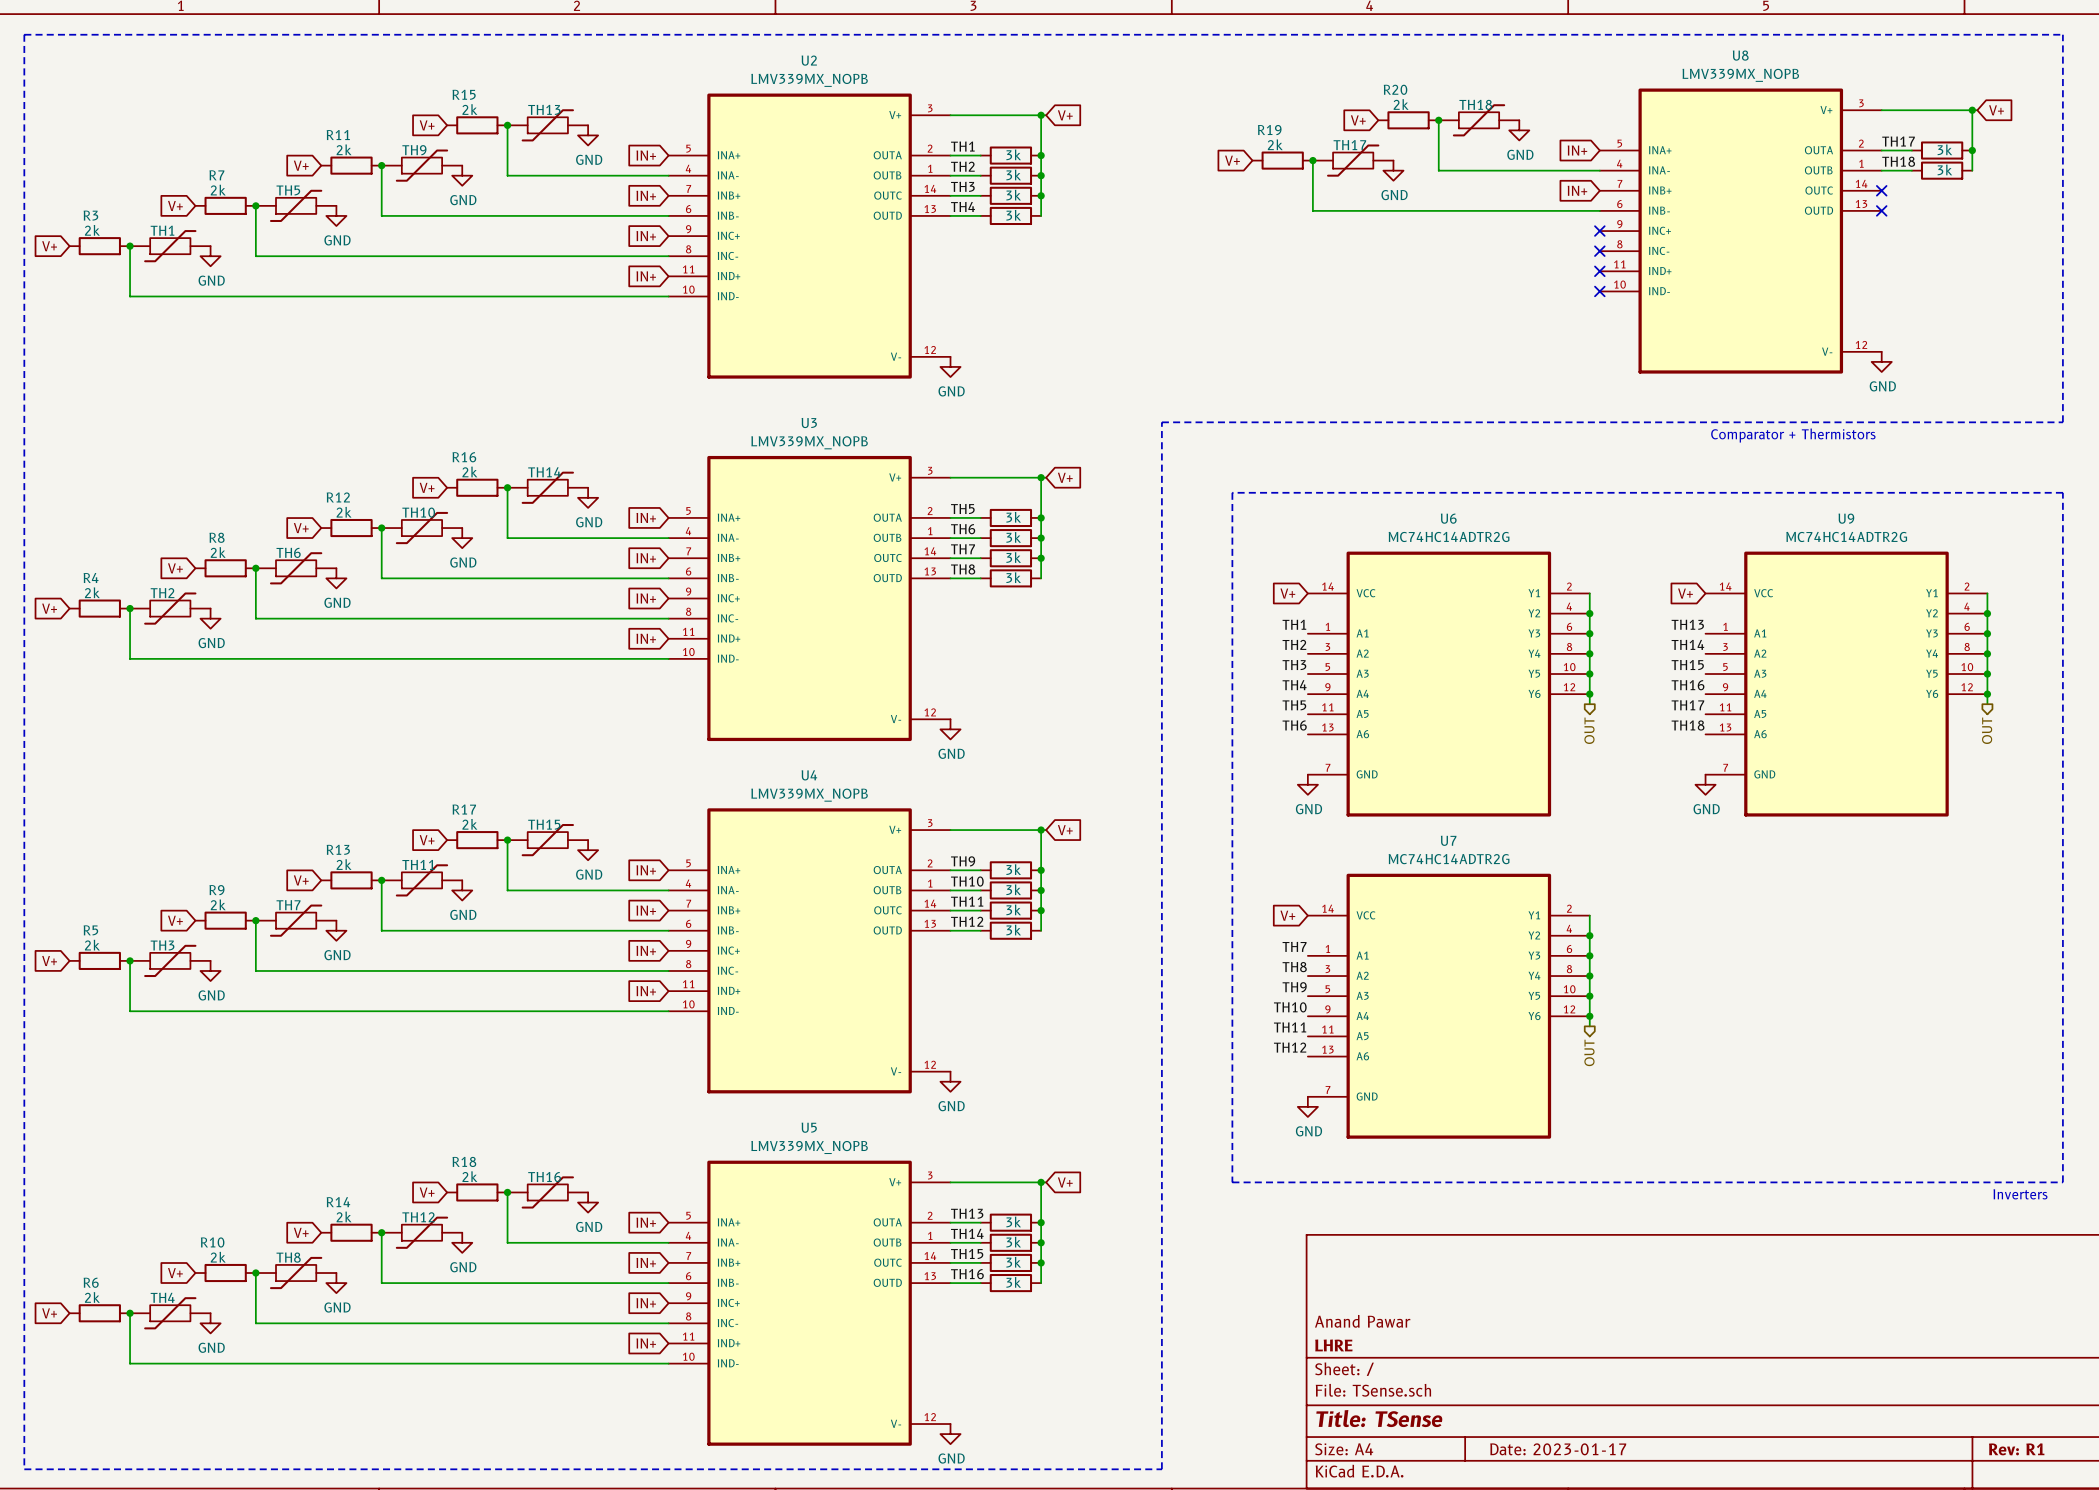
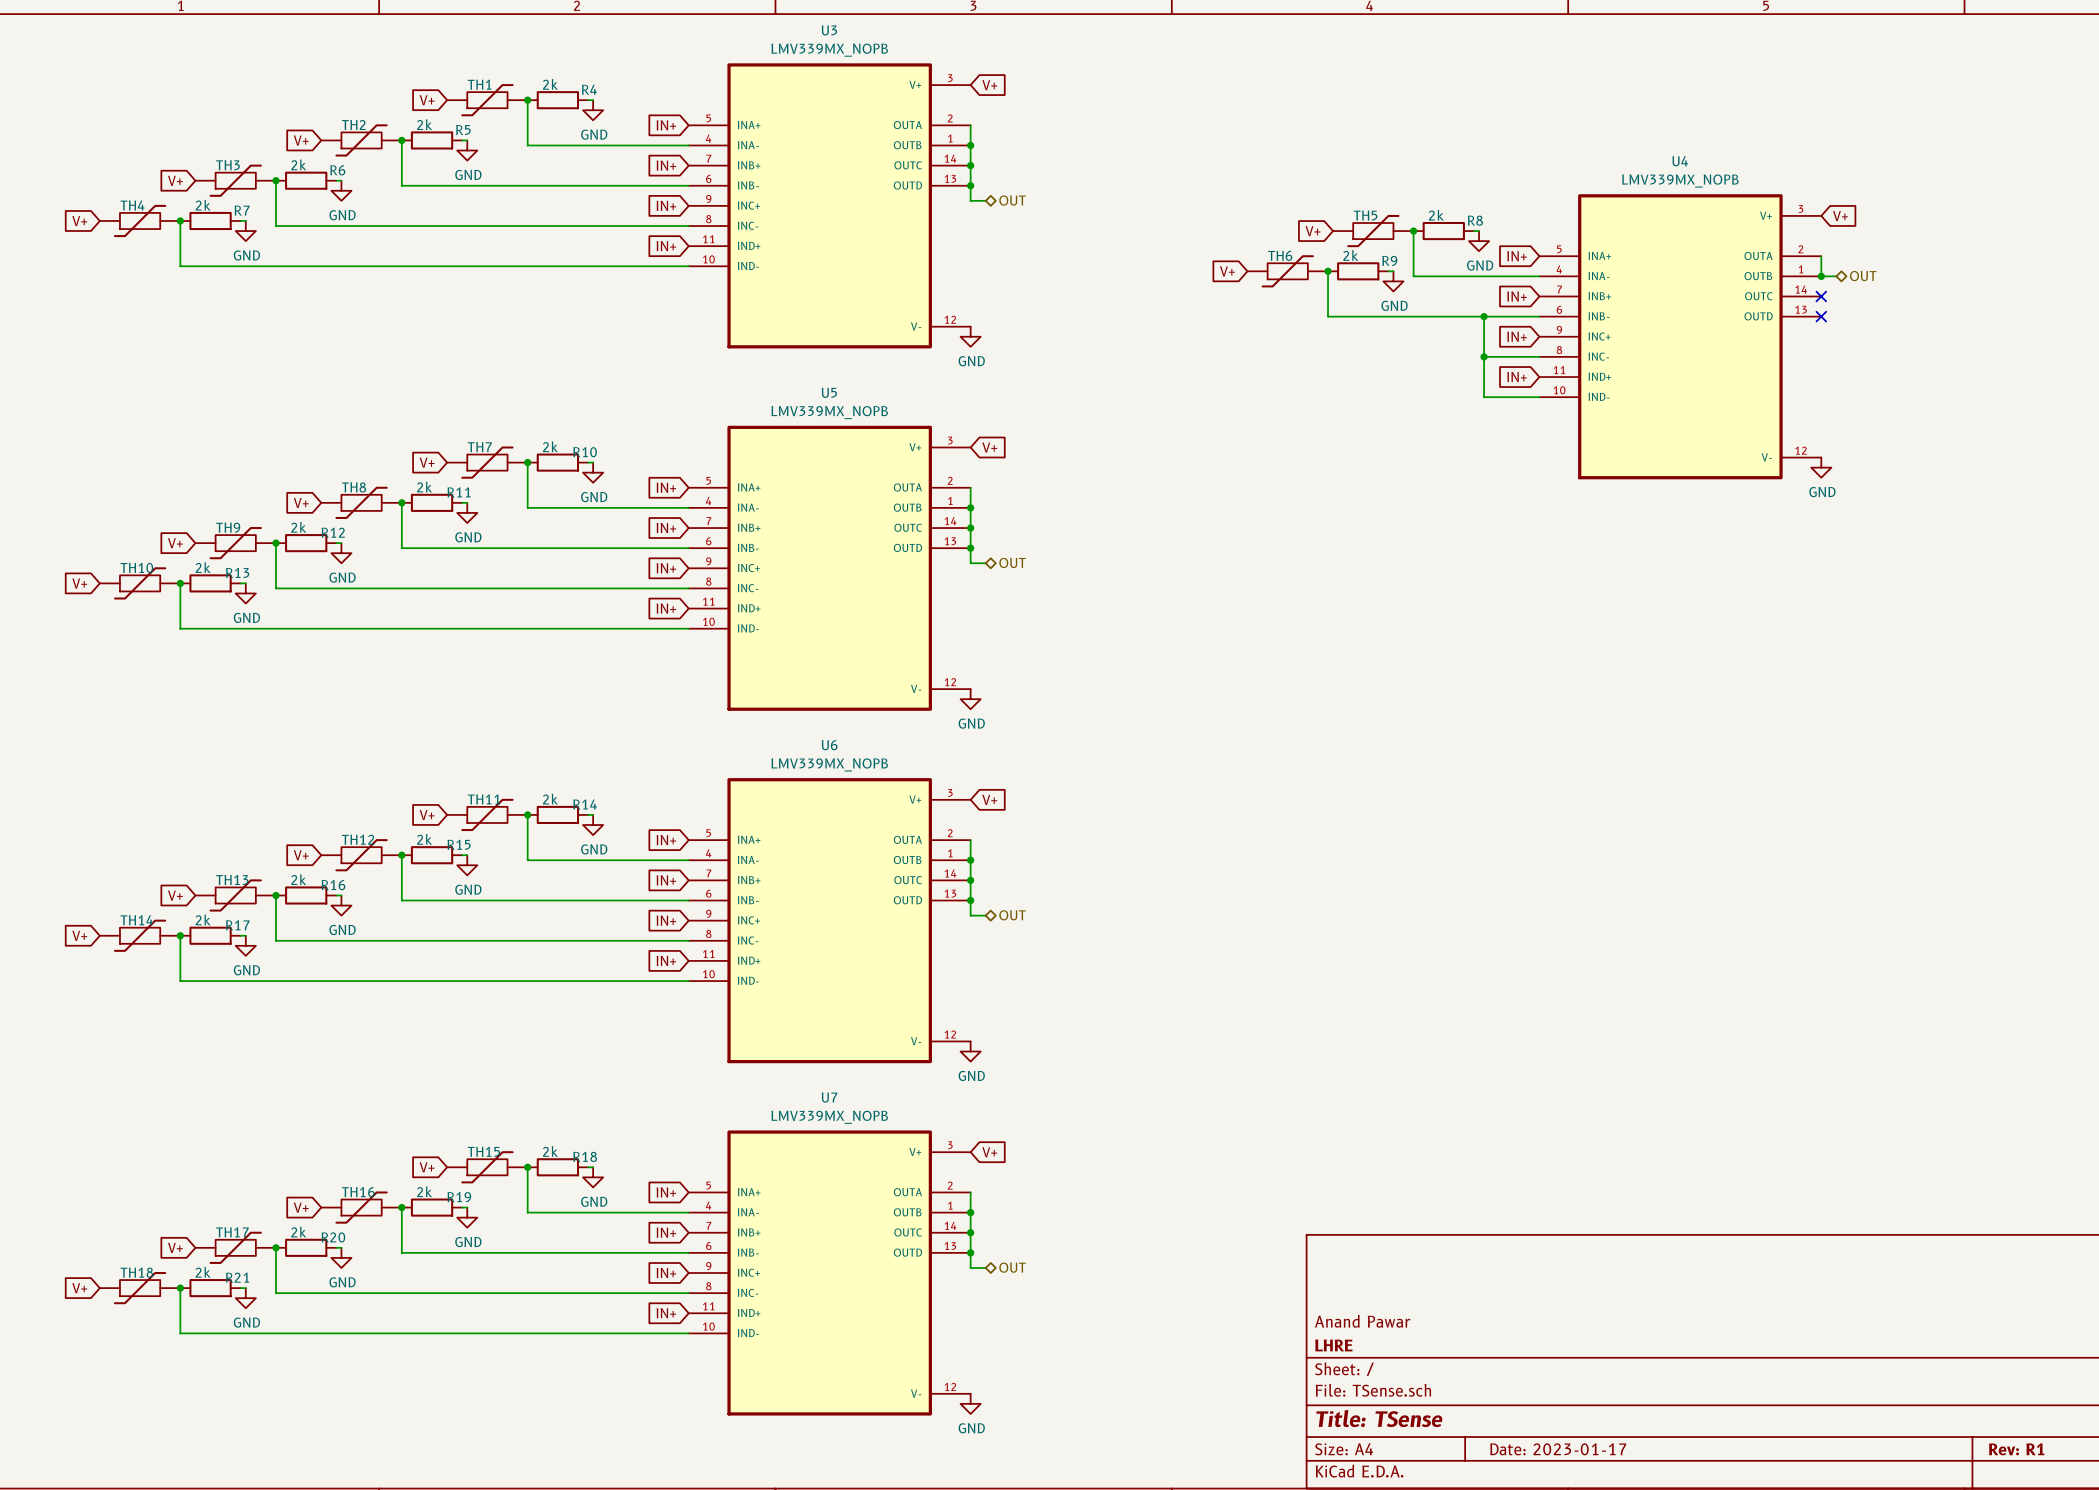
line: (24, 34) (24, 1469) (1161, 1469) (1161, 422) (2062, 422) (2062, 34) (24, 34) -> none
R20 name position: R20 (1395, 89) -> R20 (333, 1237)
R15 name position: R15 (464, 94) -> R15 (459, 844)
wire: none -> (527, 100) (527, 145) (688, 145)
wire: none -> (588, 100) (593, 100)
wire: (1881, 110) (1977, 110) -> none
wire: (1972, 110) (1972, 170) -> none
junction: (1972, 110) -> none
global label position: V+ (1996, 110) -> V+ (1840, 216)
wire: (950, 115) (1046, 115) -> none
wire: (1041, 115) (1041, 215) -> none
junction: (1041, 115) -> none
global label position: V+ (1065, 115) -> V+ (989, 85)
global label: V+ (1358, 120) -> none
R20 position: (1408, 120) -> (306, 1247)
wire: (1438, 120) (1438, 170) (1599, 170) -> none
junction: (1438, 120) -> none
TH18 position: (1479, 120) -> (140, 1288)
global label position: V+ (427, 125) -> V+ (427, 100)
R15 position: (477, 125) -> (432, 855)
wire: (507, 125) (507, 175) (668, 175) -> none
junction position: (507, 125) -> (527, 100)
TH13 position: (547, 125) -> (235, 895)
global label: none -> IN+ (666, 125)
wire: none -> (970, 125) (970, 200) (985, 200)
R19 name position: R19 (1269, 130) -> R19 (459, 1197)
power symbol: GND (1519, 130) -> none
R11 name position: R11 (338, 135) -> R11 (459, 492)
power symbol position: GND (588, 135) -> GND (593, 110)
wire: none -> (401, 140) (401, 185) (688, 185)
wire: none -> (462, 140) (467, 140)
label: TH17 (1898, 141) -> none
junction: none -> (970, 145)
label: TH1 (962, 146) -> none
global label: IN+ (1577, 150) -> none
wire: (1881, 150) (1911, 150) -> none
part: 3k (1942, 150) -> none
junction: (1972, 150) -> none
global label position: IN+ (646, 155) -> IN+ (666, 165)
wire: (950, 155) (980, 155) -> none
part: 3k (1010, 155) -> none
junction: (1041, 155) -> none
global label: V+ (1232, 160) -> none
R19 position: (1282, 160) -> (432, 1207)
wire: (1312, 160) (1312, 210) (1599, 210) -> none
junction: (1312, 160) -> none
TH17 position: (1353, 160) -> (235, 1247)
label: TH18 (1898, 161) -> none
global label position: V+ (301, 165) -> V+ (301, 140)
R11 position: (351, 165) -> (432, 502)
wire: (381, 165) (381, 215) (668, 215) -> none
junction position: (381, 165) -> (401, 140)
TH9 position: (421, 165) -> (235, 543)
junction: none -> (970, 165)
label: TH2 (962, 166) -> none
power symbol: GND (1393, 170) -> none
wire: (1881, 170) (1911, 170) -> none
part: 3k (1942, 170) -> none
R7 name position: R7 (216, 175) -> R7 (242, 210)
power symbol position: GND (462, 175) -> GND (467, 150)
wire: (950, 175) (980, 175) -> none
part: 3k (1010, 175) -> none
junction: (1041, 175) -> none
wire: none -> (276, 180) (276, 226) (688, 226)
wire: none -> (336, 180) (341, 180)
junction: none -> (970, 185)
label: TH3 (962, 186) -> none
global label: IN+ (1577, 190) -> none
no-connect mark: (1881, 190) -> none
global label position: IN+ (646, 195) -> IN+ (666, 205)
wire: (950, 195) (980, 195) -> none
part: 3k (1010, 195) -> none
junction: (1041, 195) -> none
hierarchical label: none -> OUT (1012, 200)
global label position: V+ (175, 205) -> V+ (175, 180)
R7 position: (225, 205) -> (210, 220)
wire: (255, 205) (255, 256) (668, 256) -> none
junction position: (255, 205) -> (276, 180)
TH5 position: (296, 205) -> (1373, 231)
label: TH4 (963, 206) -> none
no-connect mark: (1881, 210) -> none
power symbol position: GND (336, 215) -> GND (341, 190)
wire: (950, 215) (980, 215) -> none
part: 3k (1010, 215) -> none
wire: none -> (180, 220) (180, 266) (688, 266)
junction: none -> (180, 220)
wire: none -> (240, 220) (245, 220)
global label: none -> V+ (1313, 231)
wire: none -> (1413, 231) (1413, 276) (1539, 276)
junction: none -> (1413, 231)
wire: none -> (1473, 231) (1479, 231)
no-connect mark: (1599, 231) -> none
U8: LMV339MX_NOPB (1740, 231) -> none
global label position: IN+ (646, 236) -> IN+ (666, 246)
U2: LMV339MX_NOPB (809, 236) -> none
power symbol: none -> GND (1479, 241)
global label position: V+ (49, 246) -> V+ (79, 221)
R3: 2k (99, 246) -> none
wire: (130, 246) (130, 296) (668, 296) -> none
junction: (130, 246) -> none
TH1 position: (170, 246) -> (487, 100)
no-connect mark: (1599, 251) -> none
power symbol position: GND (210, 256) -> GND (245, 231)
global label: none -> IN+ (1517, 256)
global label: none -> V+ (1227, 271)
wire: none -> (1328, 271) (1328, 316) (1539, 316)
junction: none -> (1328, 271)
wire: none -> (1388, 271) (1393, 271)
no-connect mark: (1599, 271) -> none
global label: IN+ (646, 276) -> none
junction: none -> (1821, 276)
hierarchical label: none -> OUT (1863, 276)
power symbol: none -> GND (1393, 281)
no-connect mark: (1599, 291) -> none
global label: none -> IN+ (1517, 296)
no-connect mark: none -> (1821, 296)
wire: none -> (1484, 316) (1484, 397) (1539, 397)
junction: none -> (1484, 316)
no-connect mark: none -> (1821, 316)
global label: none -> IN+ (1517, 336)
wire: none -> (1484, 356) (1539, 356)
junction: none -> (1484, 356)
power symbol position: GND (1881, 361) -> GND (1821, 467)
power symbol position: GND (950, 366) -> GND (970, 336)
global label: none -> IN+ (1517, 377)
text: Comparator + Thermistors (1793, 435) -> none
R16 name position: R16 (464, 457) -> R16 (333, 885)
wire: none -> (527, 462) (527, 507) (688, 507)
wire: none -> (588, 462) (593, 462)
wire: (950, 477) (1046, 477) -> none
wire: (1041, 477) (1041, 578) -> none
junction: (1041, 477) -> none
global label position: V+ (1065, 477) -> V+ (989, 447)
global label position: V+ (427, 487) -> V+ (427, 462)
R16 position: (477, 487) -> (306, 895)
wire: (507, 487) (507, 538) (668, 538) -> none
junction position: (507, 487) -> (527, 462)
TH14 position: (547, 487) -> (140, 935)
global label: none -> IN+ (666, 487)
wire: none -> (970, 487) (970, 563) (985, 563)
line: (1232, 492) (2062, 492) (2062, 1182) (1232, 1182) (1232, 492) -> none
R12 name position: R12 (338, 497) -> R12 (333, 532)
power symbol position: GND (588, 497) -> GND (593, 472)
wire: none -> (401, 502) (401, 548) (688, 548)
wire: none -> (462, 502) (467, 502)
junction: none -> (970, 507)
label: TH5 (962, 508) -> none
global label position: IN+ (646, 517) -> IN+ (666, 528)
wire: (950, 517) (980, 517) -> none
part: 3k (1010, 517) -> none
junction: (1041, 517) -> none
global label position: V+ (301, 528) -> V+ (301, 502)
R12 position: (351, 528) -> (306, 543)
wire: (381, 528) (381, 578) (668, 578) -> none
junction position: (381, 528) -> (401, 502)
TH10 position: (421, 528) -> (140, 583)
junction: none -> (970, 528)
label: TH6 (963, 529) -> none
U6 value: MC74HC14ADTR2G (1449, 536) -> LMV339MX_NOPB (829, 764)
R8 name position: R8 (217, 537) -> R8 (1475, 220)
power symbol position: GND (462, 538) -> GND (467, 512)
wire: (950, 538) (980, 538) -> none
part: 3k (1010, 538) -> none
junction: (1041, 538) -> none
wire: none -> (276, 543) (276, 588) (688, 588)
wire: none -> (336, 543) (341, 543)
junction: none -> (970, 548)
label: TH7 (963, 549) -> none
U6 symbol: [1307, 551, 1590, 817] -> [688, 778, 971, 1064]
global label position: IN+ (646, 558) -> IN+ (666, 568)
wire: (950, 558) (980, 558) -> none
part: 3k (1010, 558) -> none
junction: (1041, 558) -> none
hierarchical label: none -> OUT (1012, 562)
global label position: V+ (175, 568) -> V+ (175, 543)
R8 position: (225, 568) -> (1443, 231)
wire: (255, 568) (255, 618) (668, 618) -> none
junction position: (255, 568) -> (276, 543)
TH6 position: (296, 568) -> (1287, 271)
label: TH8 (963, 569) -> none
R4 name position: R4 (91, 577) -> R4 (589, 89)
power symbol position: GND (336, 578) -> GND (341, 553)
wire: (950, 578) (980, 578) -> none
part: 3k (1010, 578) -> none
wire: none -> (180, 583) (180, 628) (688, 628)
junction: none -> (180, 583)
wire: none -> (240, 583) (245, 583)
global label: V+ (1287, 593) -> none
wire: (1589, 593) (1589, 704) -> none
global label: V+ (1685, 593) -> none
wire: (1987, 593) (1987, 704) -> none
global label position: IN+ (646, 598) -> IN+ (666, 608)
U3 position: (809, 598) -> (829, 205)
global label position: V+ (49, 608) -> V+ (79, 583)
R4 position: (99, 608) -> (557, 100)
wire: (130, 608) (130, 658) (668, 658) -> none
junction: (130, 608) -> none
TH2 position: (170, 608) -> (361, 140)
junction: (1589, 613) -> none
junction: (1987, 613) -> none
power symbol position: GND (210, 618) -> GND (245, 593)
label: TH1 (1294, 624) -> none
label: TH13 (1687, 624) -> none
junction: (1589, 633) -> none
junction: (1987, 633) -> none
global label: IN+ (646, 638) -> none
label: TH2 (1294, 644) -> none
label: TH14 (1687, 644) -> none
junction: (1589, 653) -> none
junction: (1987, 653) -> none
label: TH3 (1294, 665) -> none
label: TH15 (1687, 665) -> none
junction: (1589, 674) -> none
junction: (1987, 674) -> none
U9: MC74HC14ADTR2G (1846, 684) -> none
label: TH4 (1294, 685) -> none
label: TH16 (1688, 685) -> none
junction: (1589, 694) -> none
junction: (1987, 694) -> none
label: TH5 (1294, 705) -> none
label: TH17 (1687, 705) -> none
label: TH6 (1294, 725) -> none
label: TH18 (1688, 725) -> none
power symbol position: GND (950, 729) -> GND (970, 699)
hierarchical label: OUT (1589, 730) -> none
hierarchical label: OUT (1987, 730) -> none
power symbol: GND (1307, 784) -> none
power symbol: GND (1705, 784) -> none
R17 name position: R17 (464, 809) -> R17 (237, 925)
wire: none -> (527, 814) (527, 860) (688, 860)
wire: none -> (588, 814) (593, 814)
wire: (950, 830) (1046, 830) -> none
wire: (1041, 830) (1041, 930) -> none
junction: (1041, 830) -> none
global label position: V+ (1065, 830) -> V+ (989, 799)
global label position: V+ (427, 840) -> V+ (427, 815)
R17 position: (477, 840) -> (210, 935)
wire: (507, 840) (507, 890) (668, 890) -> none
junction position: (507, 840) -> (527, 814)
TH15 position: (547, 840) -> (487, 1167)
global label: none -> IN+ (666, 840)
wire: none -> (970, 840) (970, 915) (985, 915)
R13 name position: R13 (338, 849) -> R13 (237, 572)
power symbol position: GND (588, 850) -> GND (593, 825)
wire: none -> (401, 855) (401, 900) (688, 900)
wire: none -> (462, 855) (467, 855)
U7 value: MC74HC14ADTR2G (1449, 859) -> LMV339MX_NOPB (829, 1117)
junction: none -> (970, 860)
label: TH9 (963, 861) -> none
global label position: IN+ (646, 870) -> IN+ (666, 880)
wire: (950, 870) (980, 870) -> none
part: 3k (1010, 870) -> none
junction: (1041, 870) -> none
U7 symbol: [1307, 873, 1590, 1139] -> [688, 1130, 971, 1416]
global label position: V+ (301, 880) -> V+ (301, 855)
R13 position: (351, 880) -> (210, 583)
wire: (381, 880) (381, 930) (668, 930) -> none
junction position: (381, 880) -> (401, 855)
TH11 position: (421, 880) -> (487, 814)
junction: none -> (970, 880)
label: TH10 (967, 881) -> none
R9 name position: R9 (216, 890) -> R9 (1389, 260)
power symbol position: GND (462, 890) -> GND (467, 865)
wire: (950, 890) (980, 890) -> none
part: 3k (1010, 890) -> none
junction: (1041, 890) -> none
wire: none -> (276, 895) (276, 940) (688, 940)
wire: none -> (336, 895) (341, 895)
junction: none -> (970, 900)
label: TH11 (967, 901) -> none
global label position: IN+ (646, 910) -> IN+ (666, 920)
wire: (950, 910) (980, 910) -> none
part: 3k (1010, 910) -> none
junction: (1041, 910) -> none
hierarchical label: none -> OUT (1012, 915)
global label: V+ (1287, 915) -> none
wire: (1589, 915) (1589, 1026) -> none
global label position: V+ (175, 920) -> V+ (175, 895)
R9 position: (225, 920) -> (1358, 271)
wire: (255, 920) (255, 970) (668, 970) -> none
junction position: (255, 920) -> (276, 895)
TH7 position: (296, 920) -> (487, 462)
label: TH12 (967, 921) -> none
R5 name position: R5 (90, 930) -> R5 (463, 130)
power symbol position: GND (336, 930) -> GND (341, 905)
wire: (950, 930) (980, 930) -> none
part: 3k (1010, 930) -> none
wire: none -> (180, 935) (180, 981) (688, 981)
junction: none -> (180, 935)
wire: none -> (240, 935) (245, 935)
junction: (1589, 935) -> none
label: TH7 (1294, 946) -> none
global label position: IN+ (646, 950) -> IN+ (666, 960)
U4 position: (809, 950) -> (1680, 336)
junction: (1589, 955) -> none
global label position: V+ (49, 960) -> V+ (79, 935)
R5 position: (99, 960) -> (432, 140)
wire: (130, 960) (130, 1011) (668, 1011) -> none
junction: (130, 960) -> none
TH3 position: (170, 960) -> (235, 180)
label: TH8 (1294, 967) -> none
power symbol position: GND (210, 970) -> GND (245, 945)
junction: (1589, 976) -> none
label: TH9 (1294, 987) -> none
global label: IN+ (646, 991) -> none
junction: (1589, 996) -> none
label: TH10 (1290, 1007) -> none
junction: (1589, 1016) -> none
label: TH11 (1290, 1027) -> none
label: TH12 (1290, 1047) -> none
hierarchical label: OUT (1589, 1052) -> none
power symbol position: GND (950, 1081) -> GND (970, 1051)
power symbol: GND (1307, 1106) -> none
R18 name position: R18 (464, 1161) -> R18 (585, 1156)
wire: none -> (527, 1167) (527, 1212) (688, 1212)
wire: none -> (588, 1167) (593, 1167)
wire: (950, 1182) (1046, 1182) -> none
wire: (1041, 1182) (1041, 1283) -> none
junction: (1041, 1182) -> none
global label position: V+ (1065, 1182) -> V+ (989, 1152)
global label position: V+ (427, 1192) -> V+ (427, 1167)
R18 position: (477, 1192) -> (557, 1167)
wire: (507, 1192) (507, 1242) (668, 1242) -> none
junction position: (507, 1192) -> (527, 1167)
TH16 position: (547, 1192) -> (361, 1207)
global label: none -> IN+ (666, 1192)
wire: none -> (970, 1192) (970, 1267) (985, 1267)
text: Inverters (2020, 1194) -> none
R14 name position: R14 (338, 1202) -> R14 (585, 804)
power symbol position: GND (588, 1202) -> GND (593, 1177)
wire: none -> (401, 1207) (401, 1252) (688, 1252)
wire: none -> (462, 1207) (467, 1207)
junction: none -> (970, 1212)
label: TH13 (967, 1213) -> none
global label position: IN+ (646, 1222) -> IN+ (666, 1232)
wire: (950, 1222) (980, 1222) -> none
part: 3k (1010, 1222) -> none
junction: (1041, 1222) -> none
global label position: V+ (301, 1232) -> V+ (301, 1207)
R14 position: (351, 1232) -> (557, 814)
wire: (381, 1232) (381, 1283) (668, 1283) -> none
junction position: (381, 1232) -> (401, 1207)
TH12 position: (421, 1232) -> (361, 855)
junction: none -> (970, 1232)
label: TH14 (967, 1233) -> none
R10 name position: R10 (212, 1242) -> R10 (585, 452)
power symbol position: GND (462, 1242) -> GND (467, 1217)
wire: (950, 1242) (980, 1242) -> none
part: 3k (1010, 1242) -> none
junction: (1041, 1242) -> none
wire: none -> (276, 1247) (276, 1293) (688, 1293)
wire: none -> (336, 1247) (341, 1247)
junction: none -> (970, 1252)
label: TH15 (967, 1253) -> none
global label position: IN+ (646, 1262) -> IN+ (666, 1273)
wire: (950, 1262) (980, 1262) -> none
part: 3k (1010, 1262) -> none
junction: (1041, 1262) -> none
hierarchical label: none -> OUT (1012, 1267)
global label position: V+ (175, 1273) -> V+ (175, 1247)
R10 position: (225, 1273) -> (557, 462)
wire: (255, 1273) (255, 1323) (668, 1323) -> none
junction position: (255, 1273) -> (276, 1247)
TH8 position: (296, 1273) -> (361, 502)
label: TH16 (967, 1274) -> none
R6 name position: R6 (91, 1282) -> R6 (337, 170)
power symbol position: GND (336, 1283) -> GND (341, 1257)
wire: (950, 1283) (980, 1283) -> none
part: 3k (1010, 1283) -> none
wire: none -> (180, 1288) (180, 1333) (688, 1333)
junction: none -> (180, 1288)
R21: none -> 2k (210, 1288)
wire: none -> (240, 1288) (245, 1288)
global label position: IN+ (646, 1303) -> IN+ (666, 1313)
U5 position: (809, 1303) -> (829, 568)
global label position: V+ (49, 1313) -> V+ (79, 1288)
R6 position: (99, 1313) -> (306, 180)
wire: (130, 1313) (130, 1363) (668, 1363) -> none
junction: (130, 1313) -> none
TH4 position: (170, 1313) -> (140, 220)
power symbol position: GND (210, 1323) -> GND (245, 1298)
global label: IN+ (646, 1343) -> none
power symbol position: GND (950, 1434) -> GND (970, 1403)

